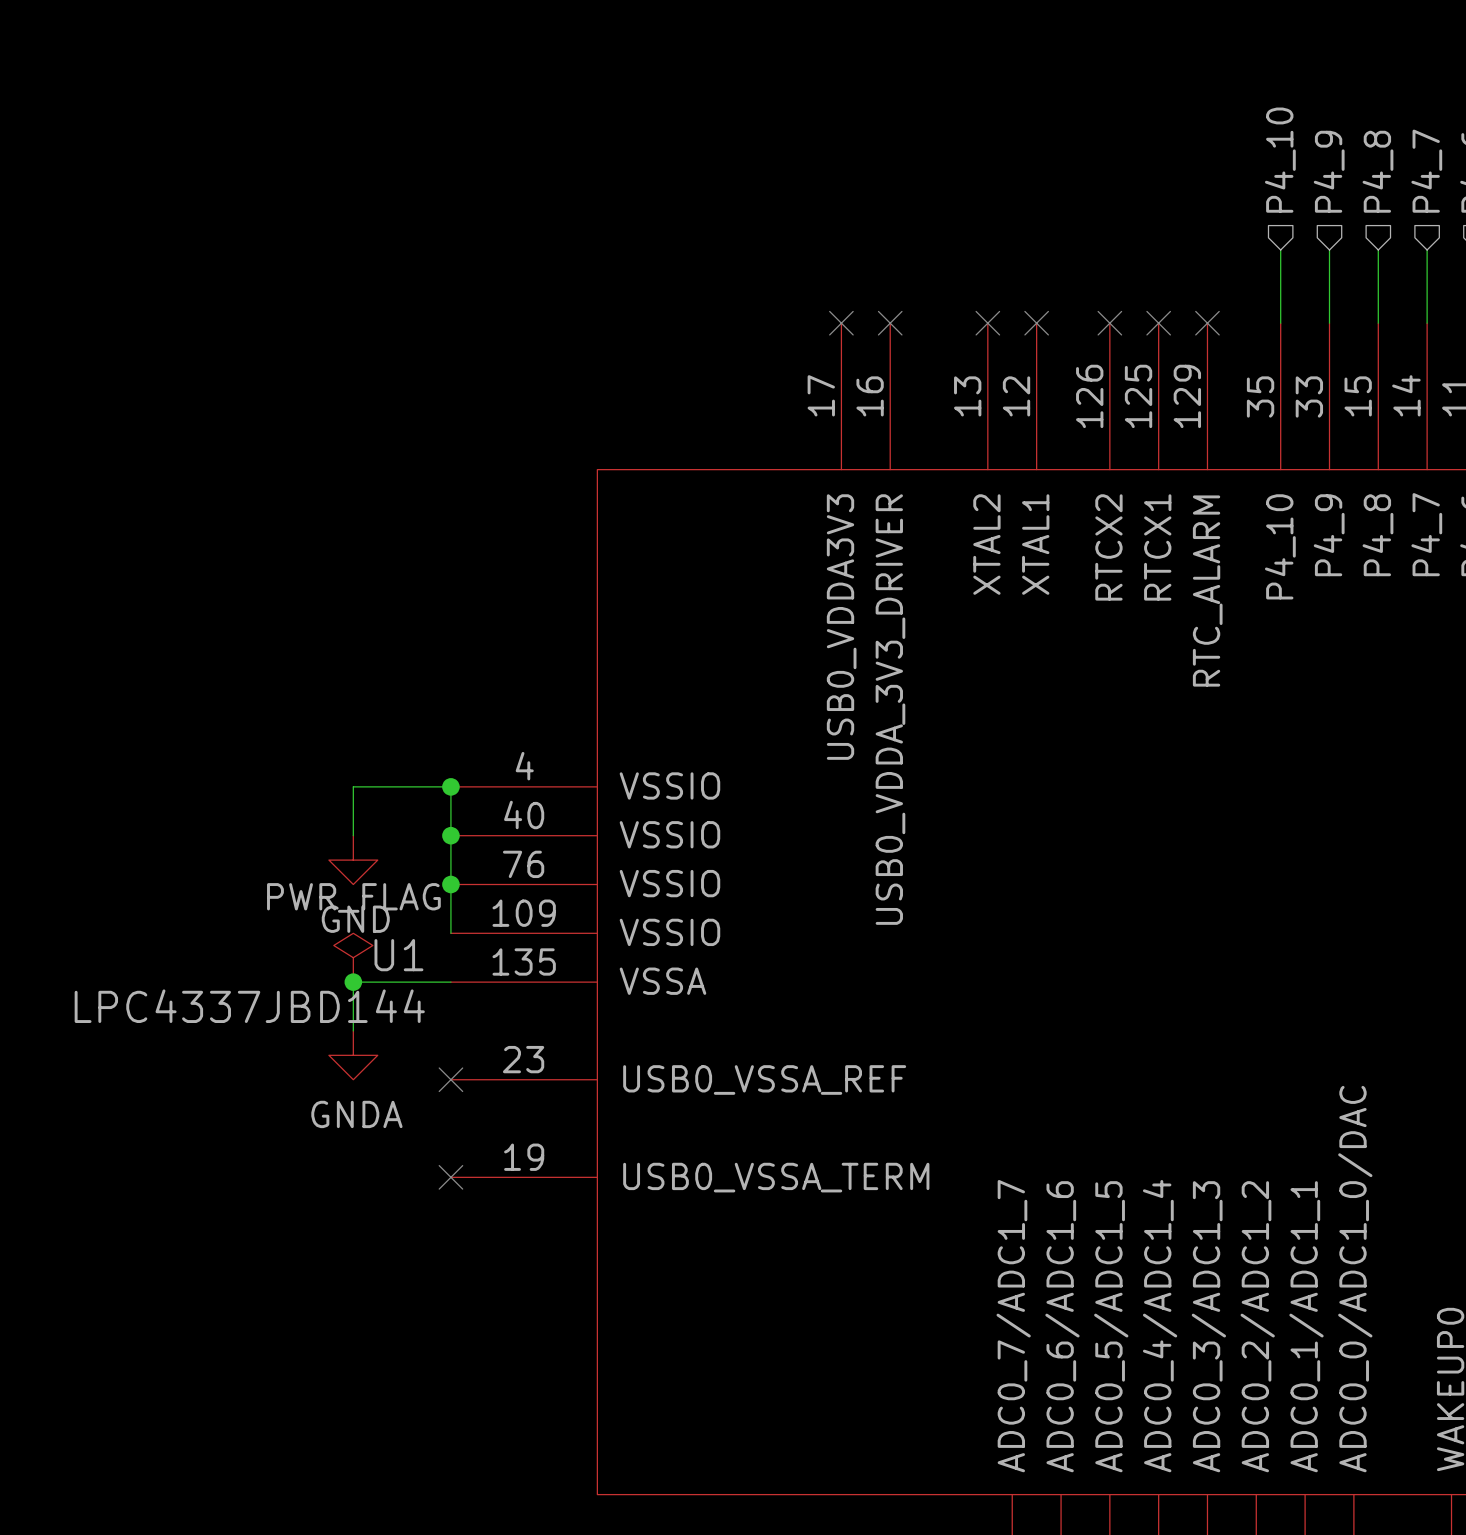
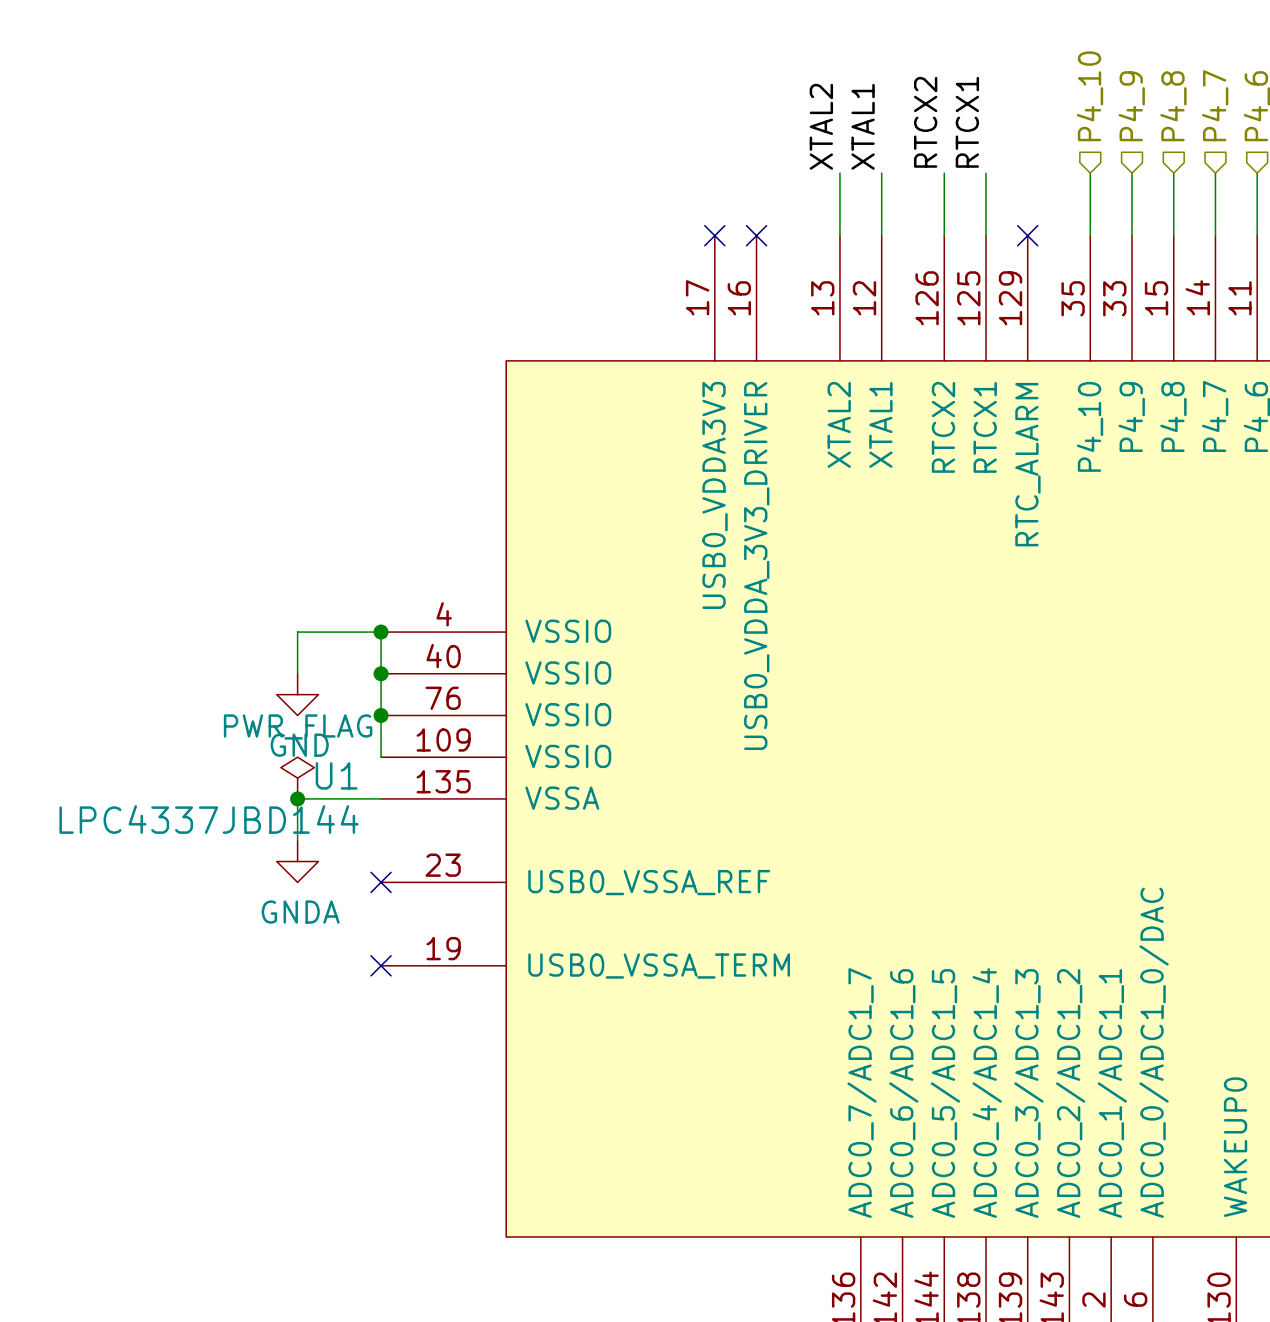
label: none -> RTCX2 (925, 122)
label: none -> RTCX1 (967, 122)
label: none -> XTAL2 (821, 126)
label: none -> XTAL1 (863, 126)
wire: none -> (839, 173) (839, 235)
wire: none -> (881, 173) (881, 235)
wire: none -> (944, 173) (944, 235)
wire: none -> (985, 173) (985, 235)
no-connect mark: (987, 323) -> none
no-connect mark: (1036, 323) -> none
no-connect mark: (1109, 323) -> none
no-connect mark: (1158, 323) -> none

